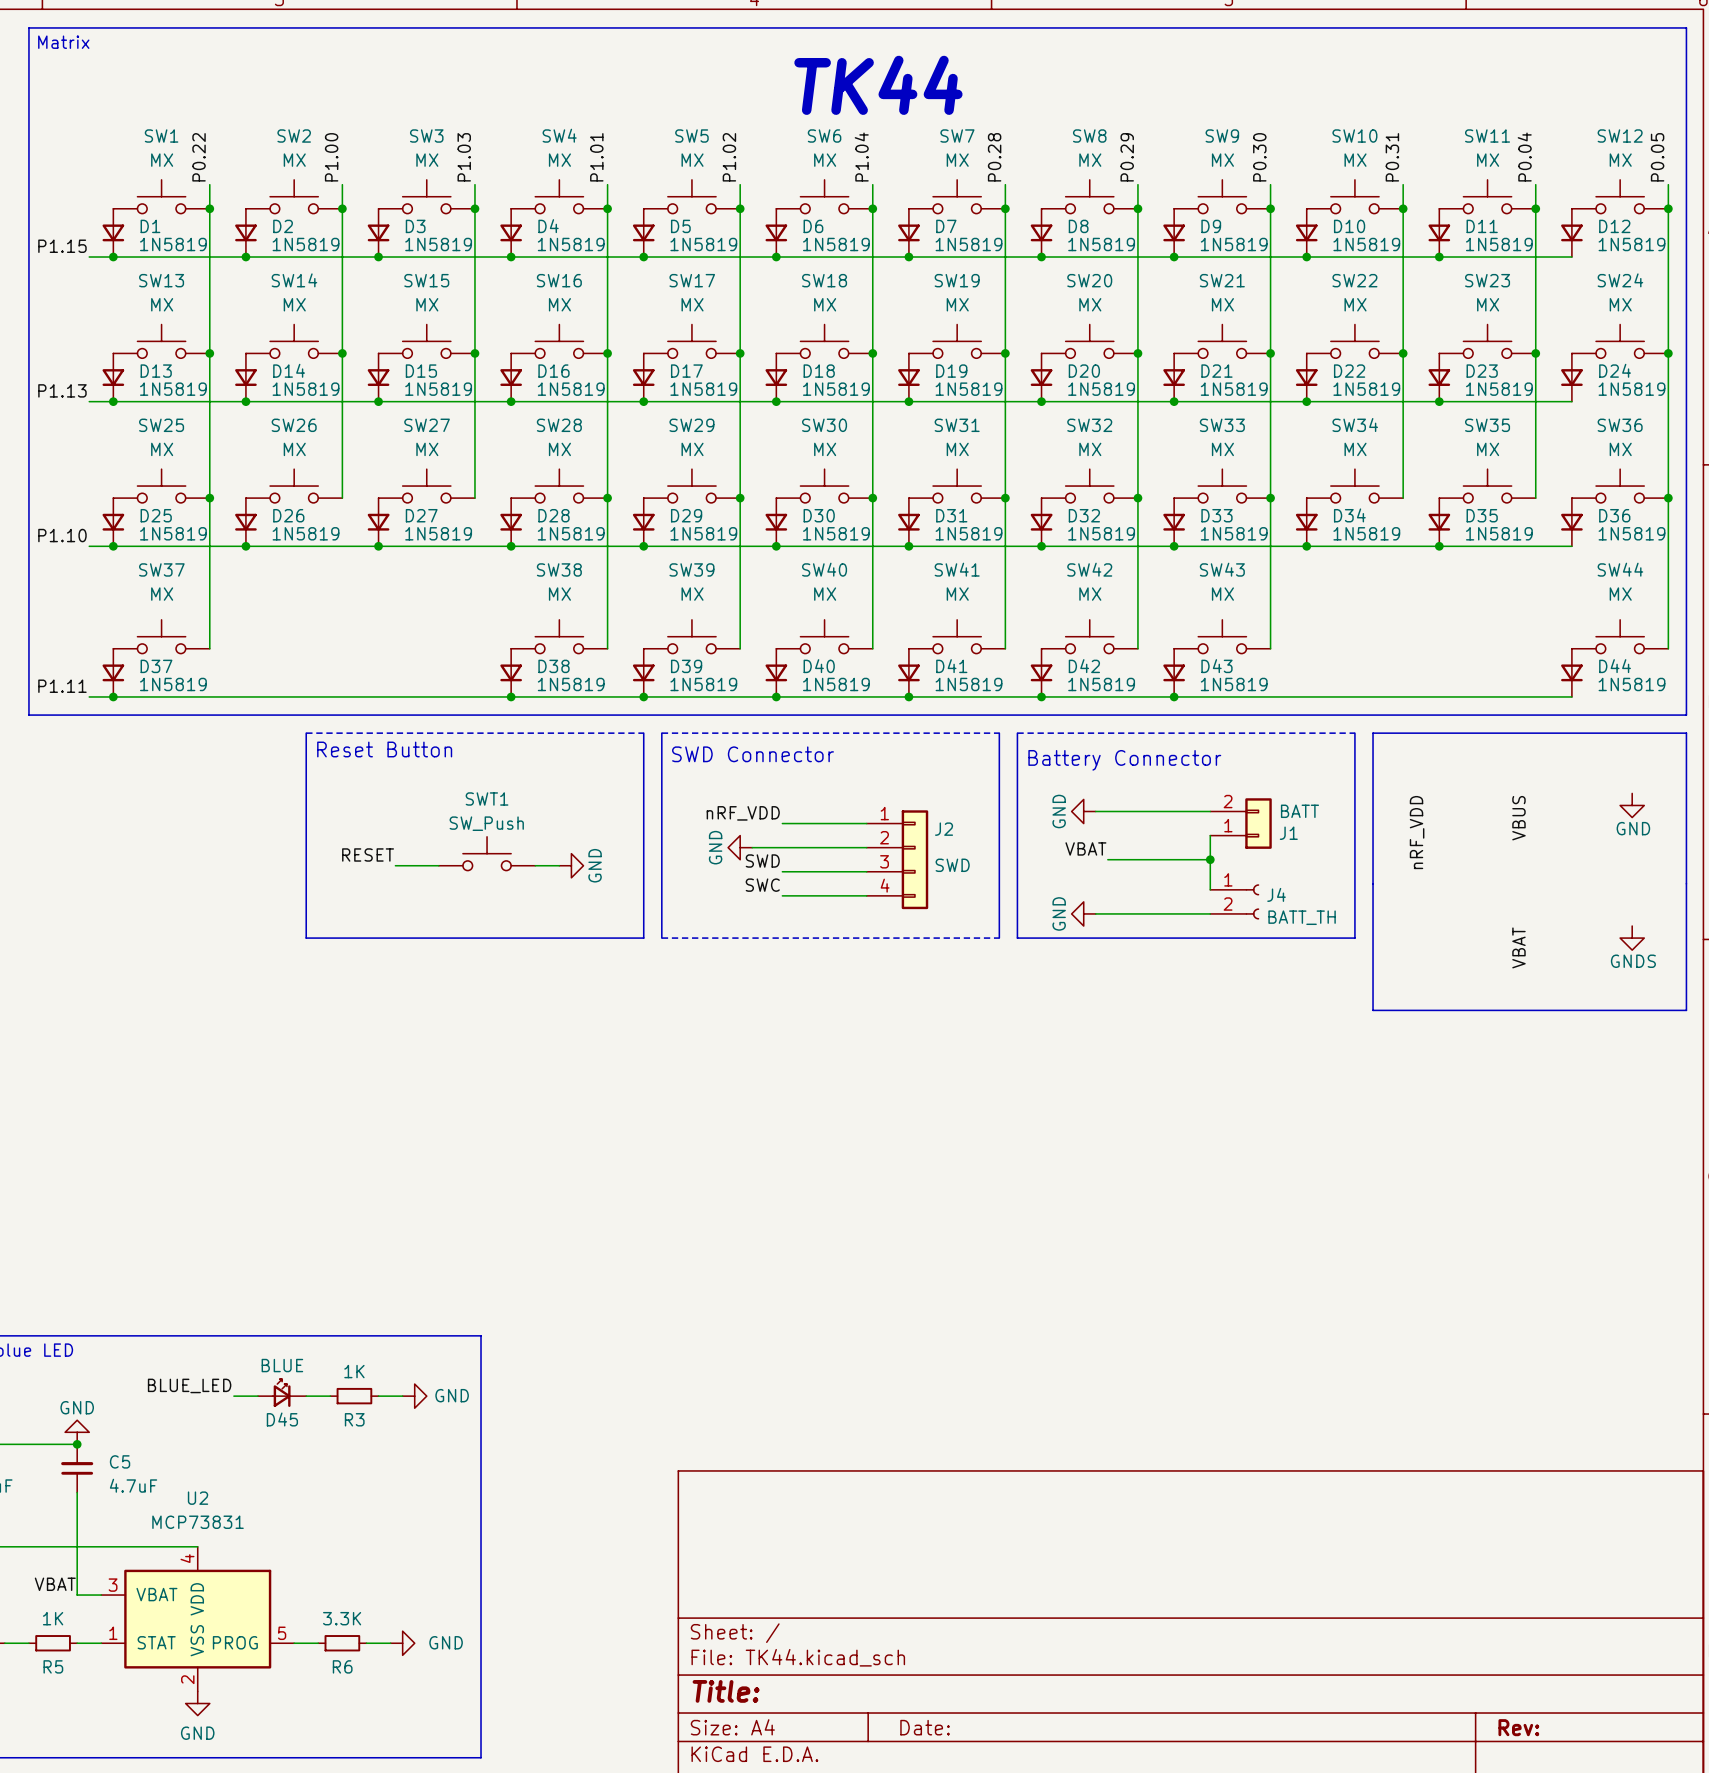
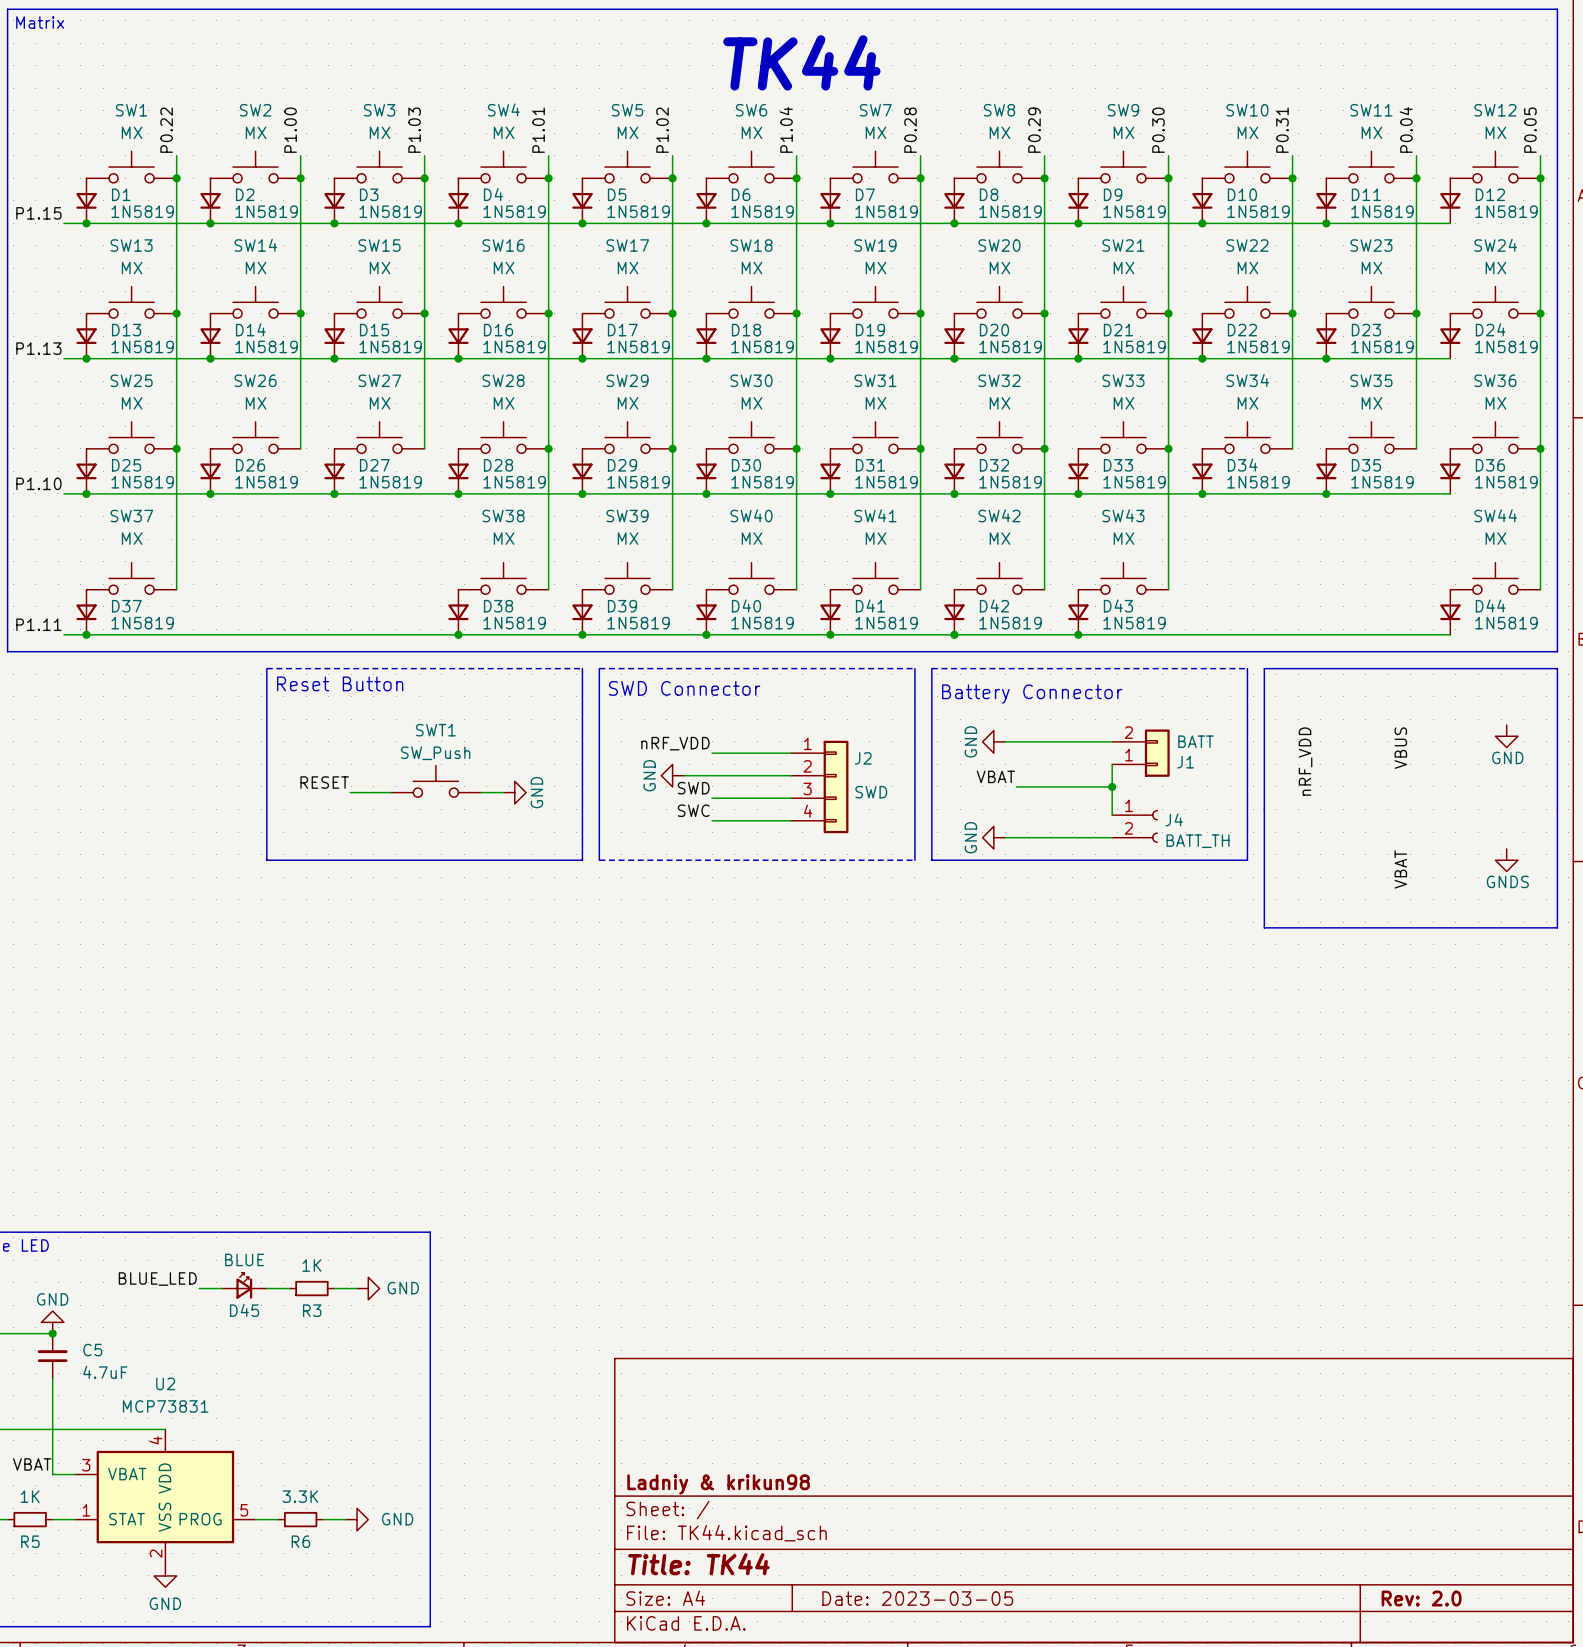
title block: none -> Ladniy & krikun98 (718, 1484)
title block: Title: (726, 1691) -> Title: TK44 (698, 1564)
title block: Date: (925, 1727) -> Date: 2023-03-05 (917, 1598)
title block: Rev: (1518, 1727) -> Rev: 2.0 (1421, 1598)

